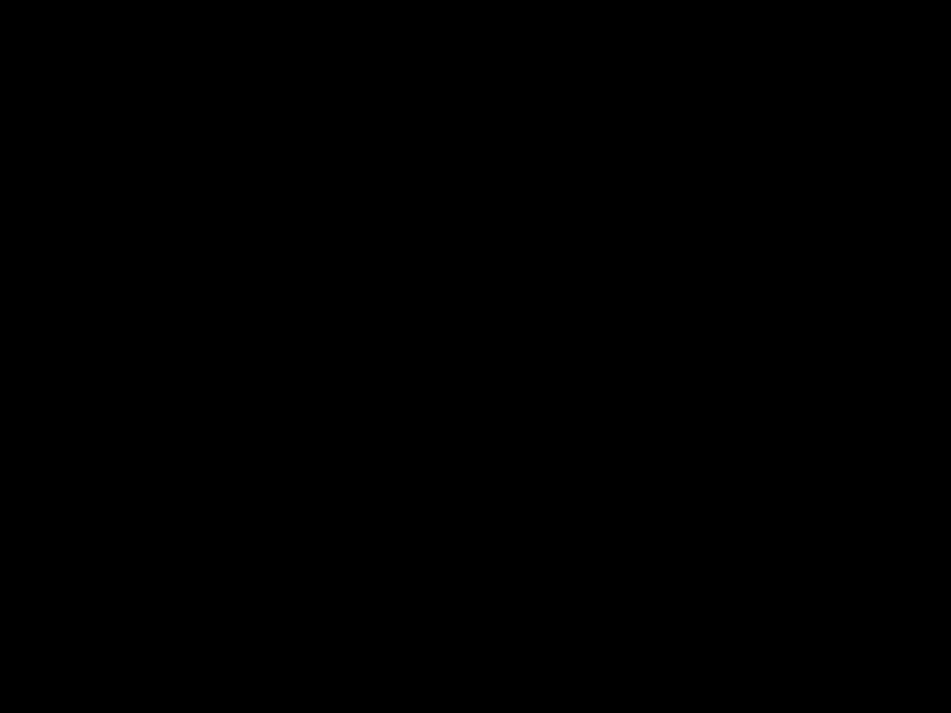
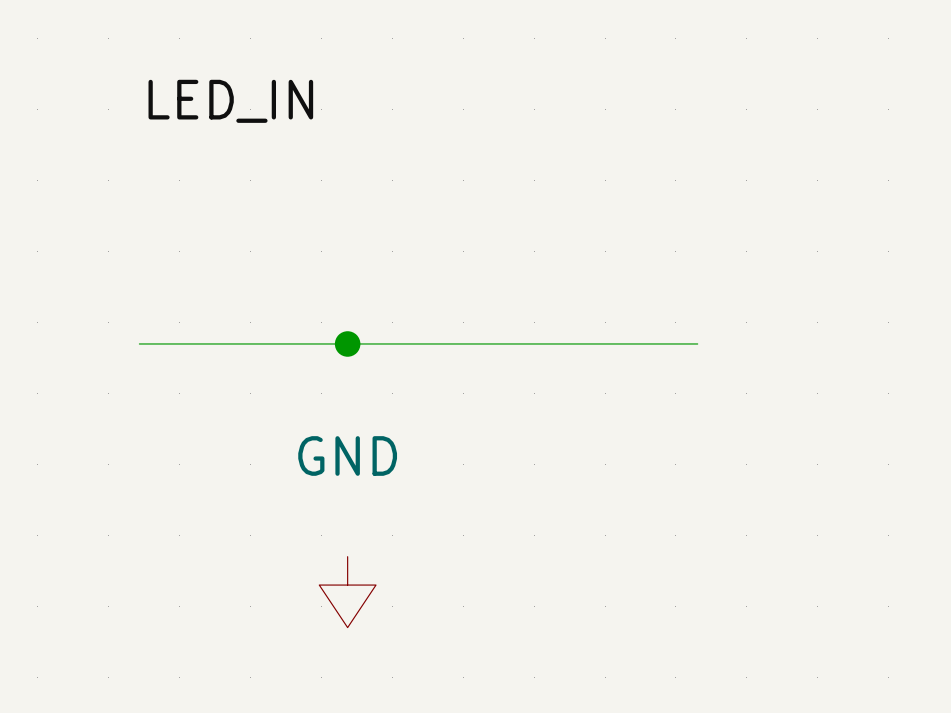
label: none -> LED_IN (230, 101)
wire: none -> (139, 343) (697, 343)
junction: none -> (347, 343)
power symbol: none -> GND (347, 592)

